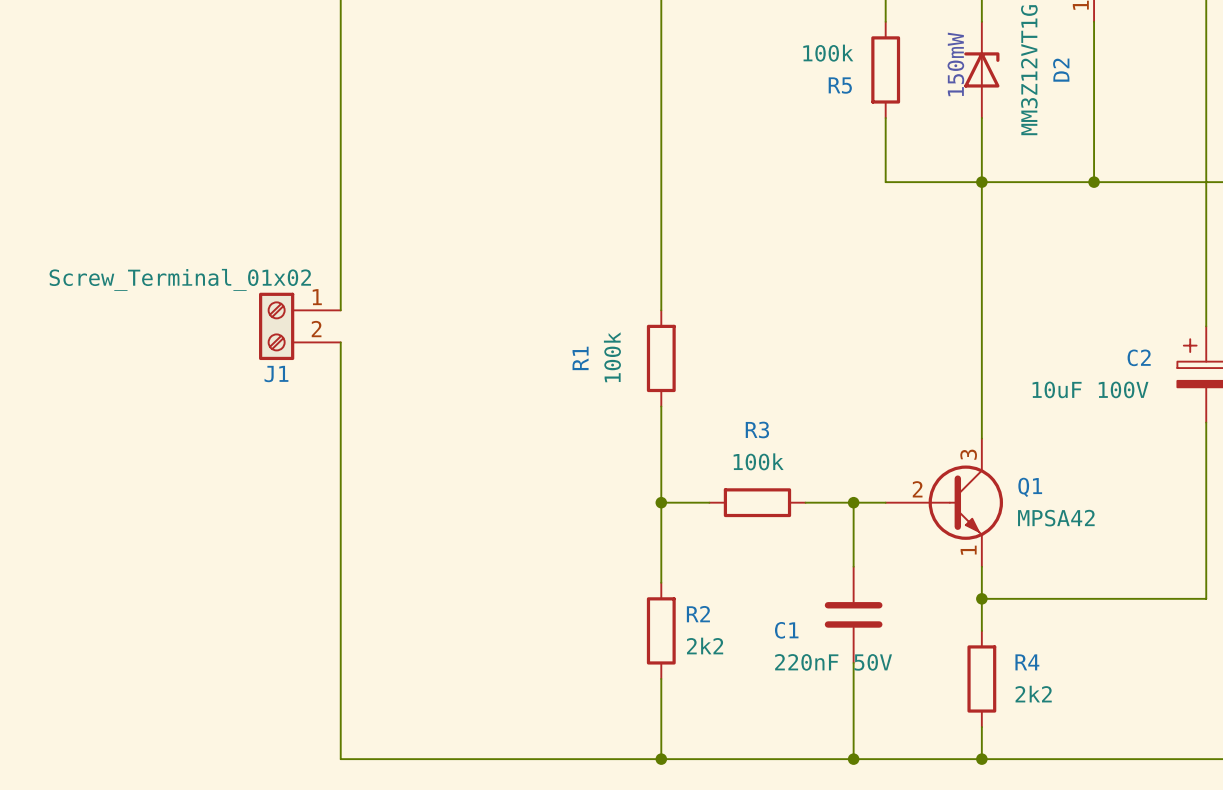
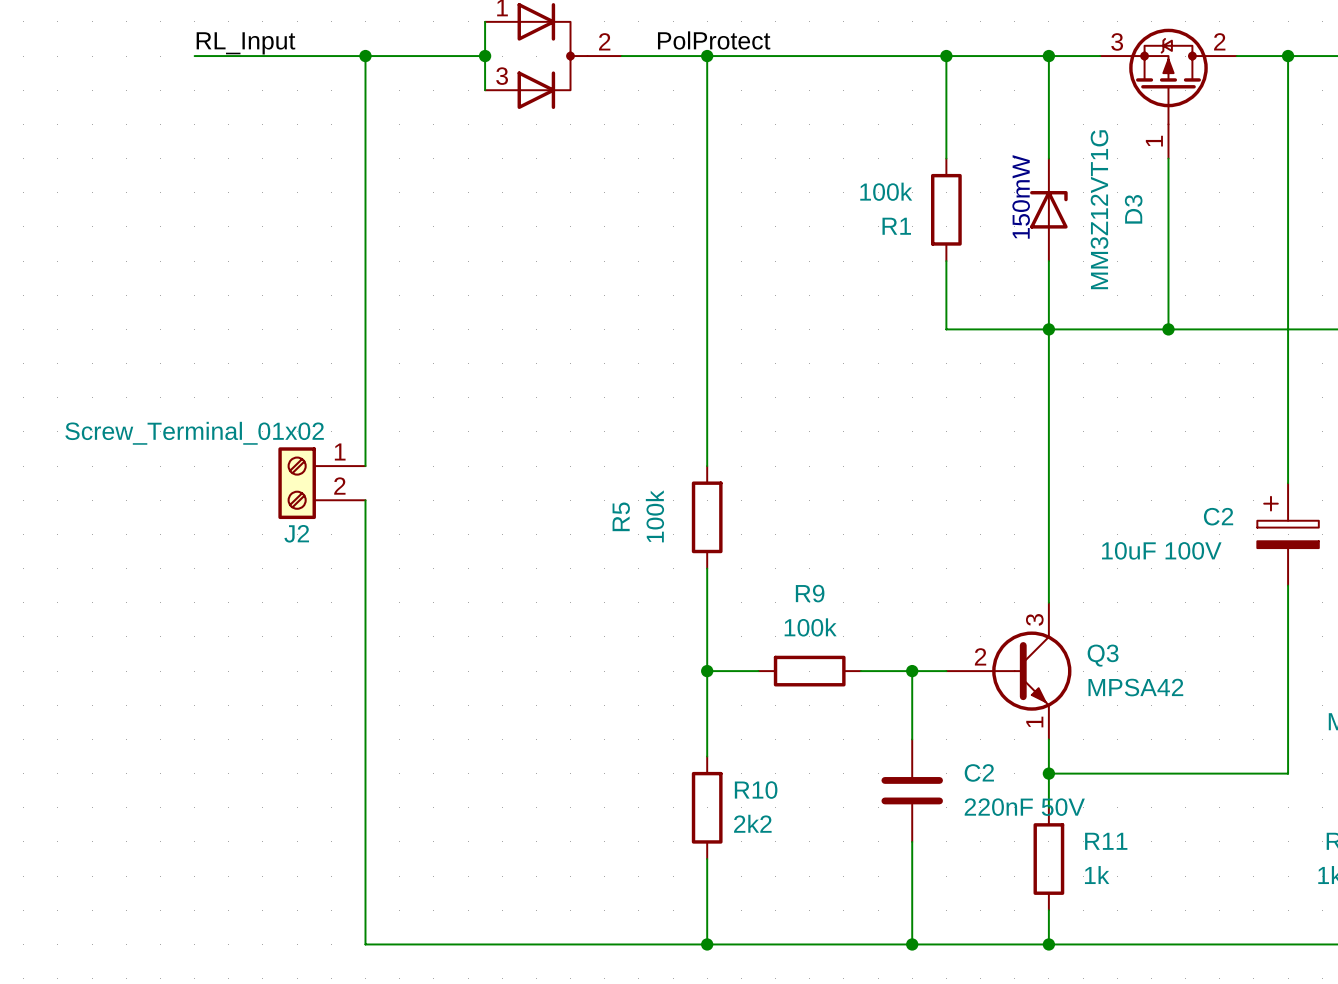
D2 name: D2 (1061, 70) -> D3 (1133, 209)
R5 name: R5 (840, 85) -> R1 (896, 226)
R1 name: R1 (580, 358) -> R5 (621, 516)
J1 name: J1 (276, 374) -> J2 (296, 533)
R3 name: R3 (757, 429) -> R9 (810, 593)
Q1 name: Q1 (1030, 487) -> Q3 (1103, 655)
R2 name: R2 (698, 614) -> R10 (756, 790)
C1 name: C1 (786, 630) -> C2 (979, 772)
C1 value position: 220nF 50V (833, 662) -> 220nF 50V (1024, 807)
R4 name: R4 (1027, 662) -> R11 (1106, 841)
R4 value: 2k2 (1033, 694) -> 1k (1097, 875)

